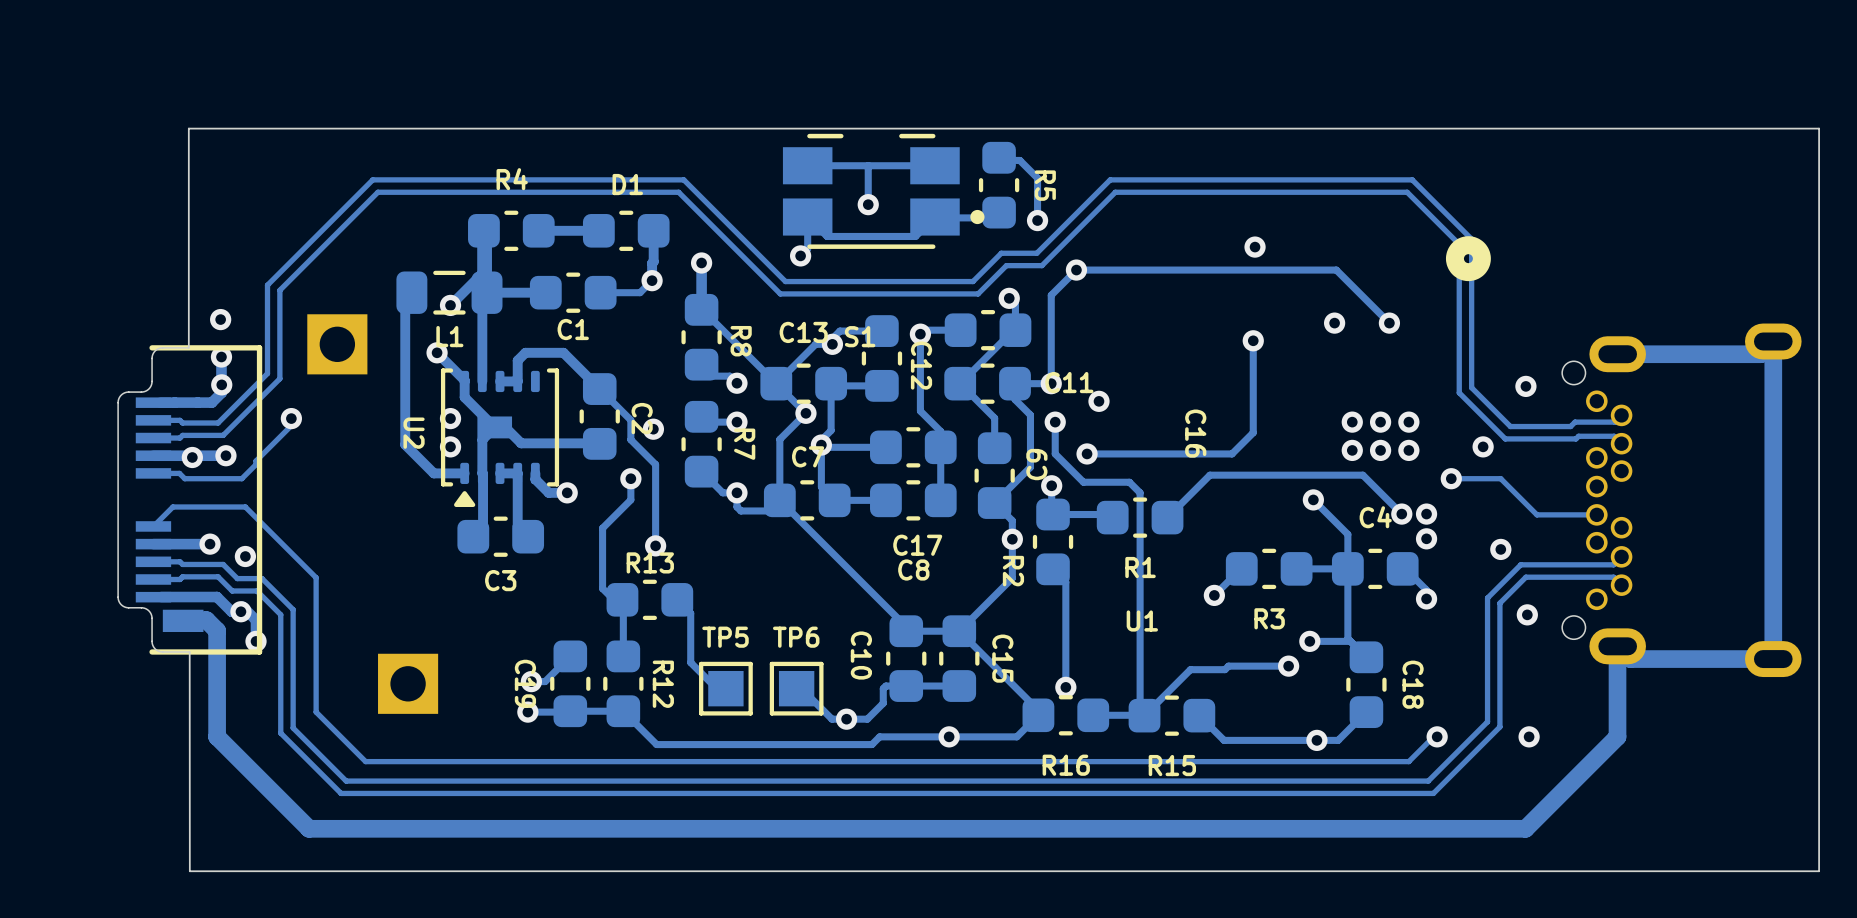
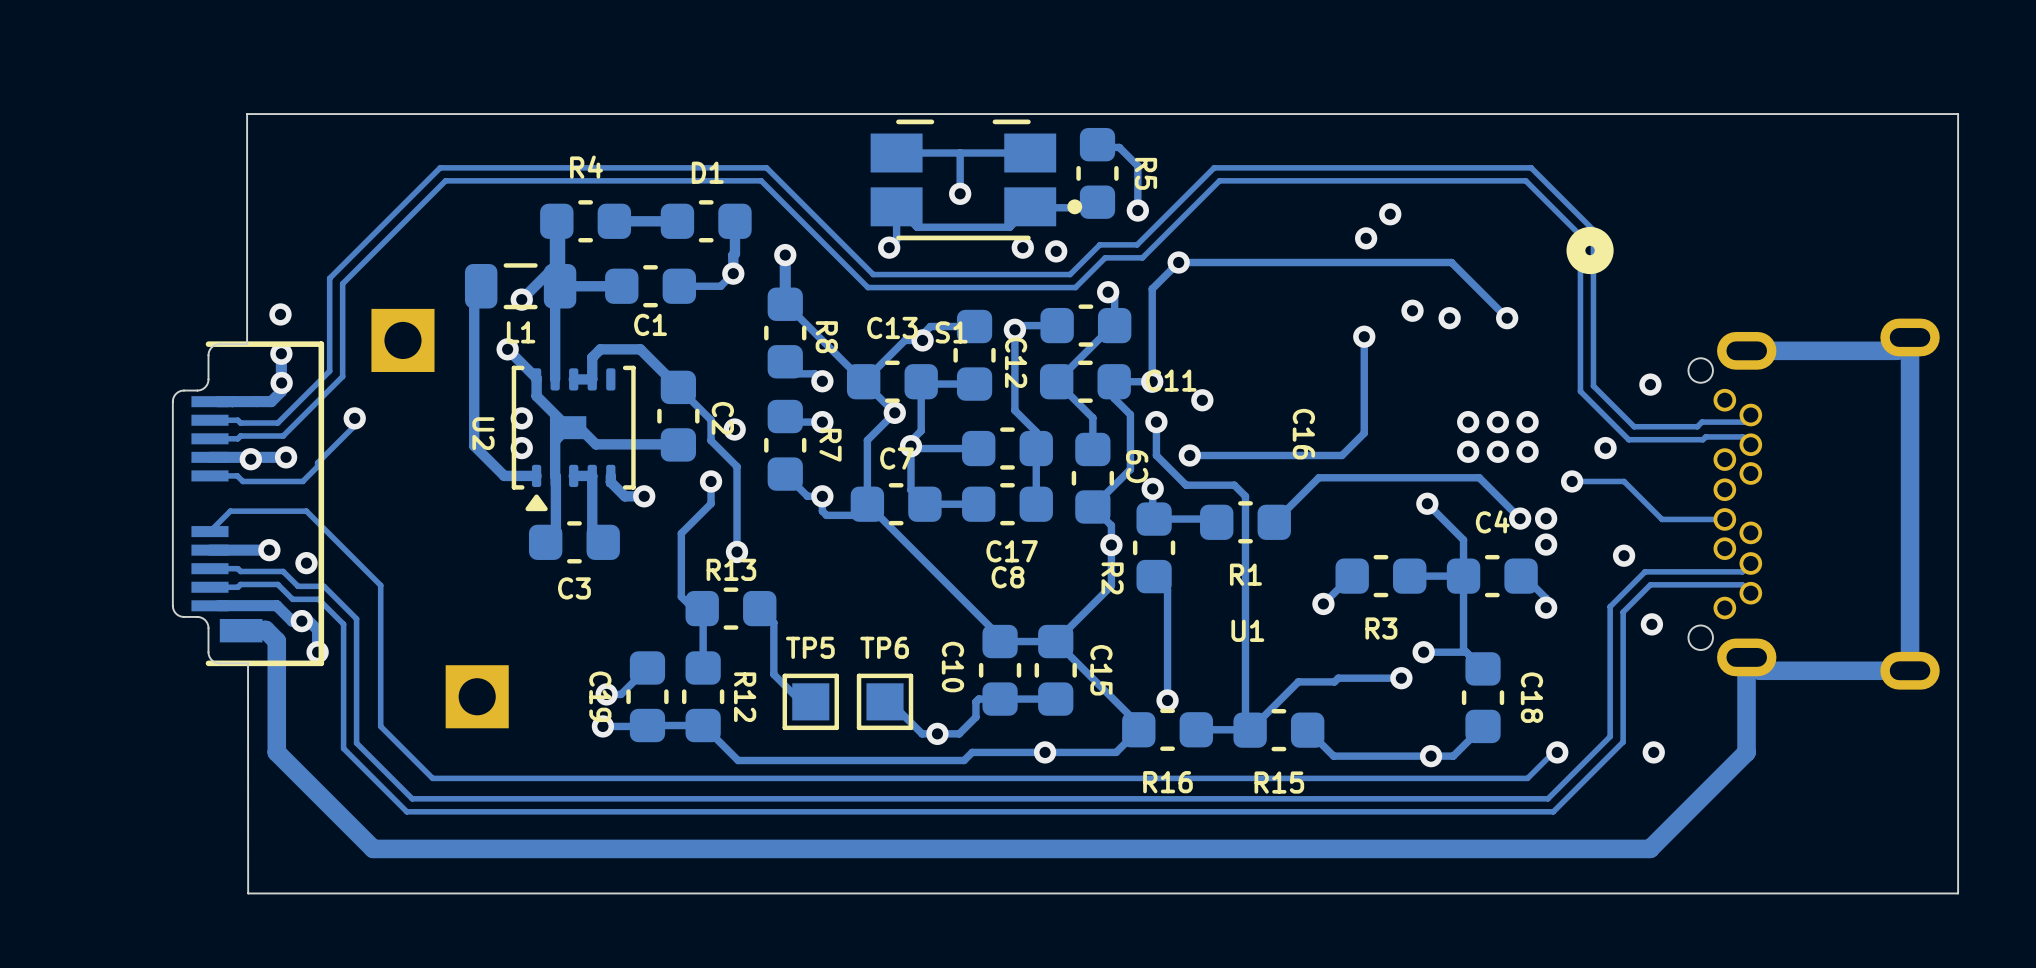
via: none -> (1390, 214)
via: none -> (1022, 247)
via: none -> (1056, 251)
via: none -> (1412, 310)

